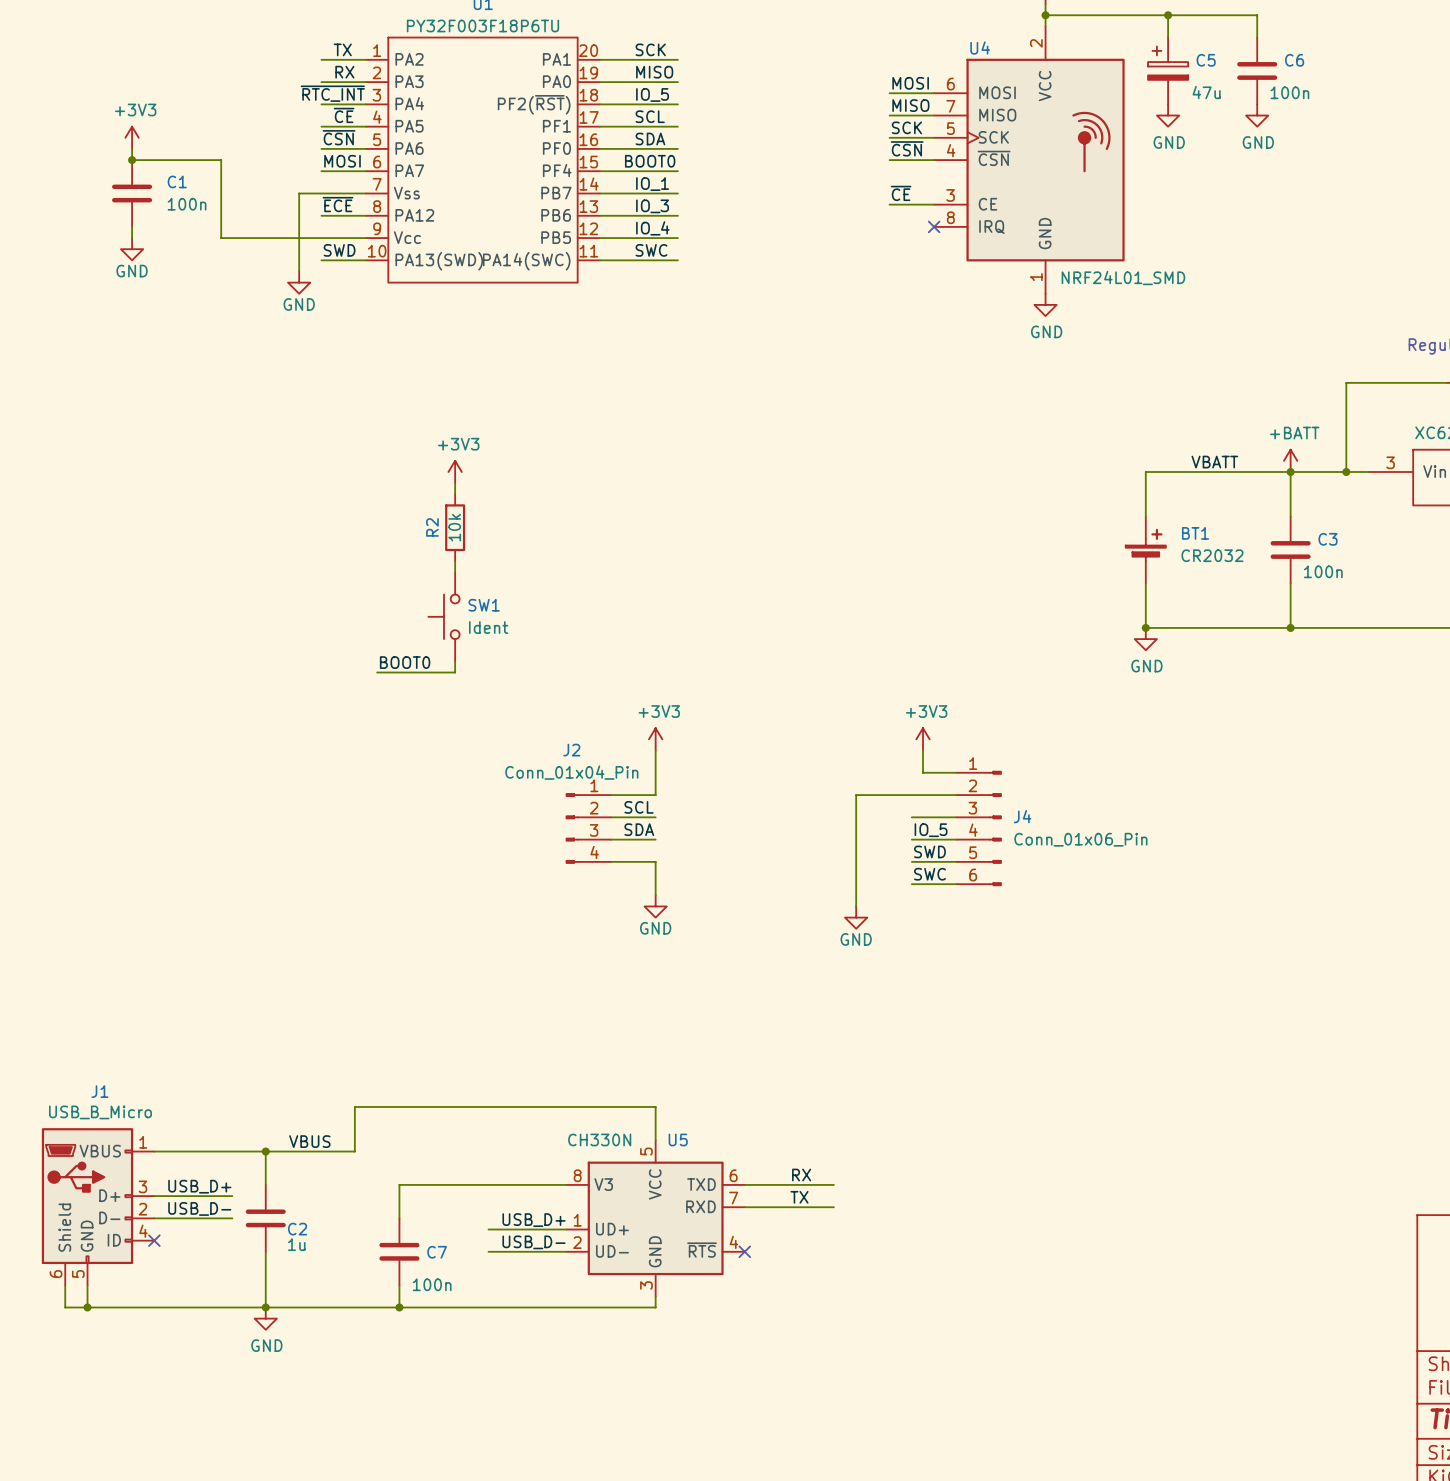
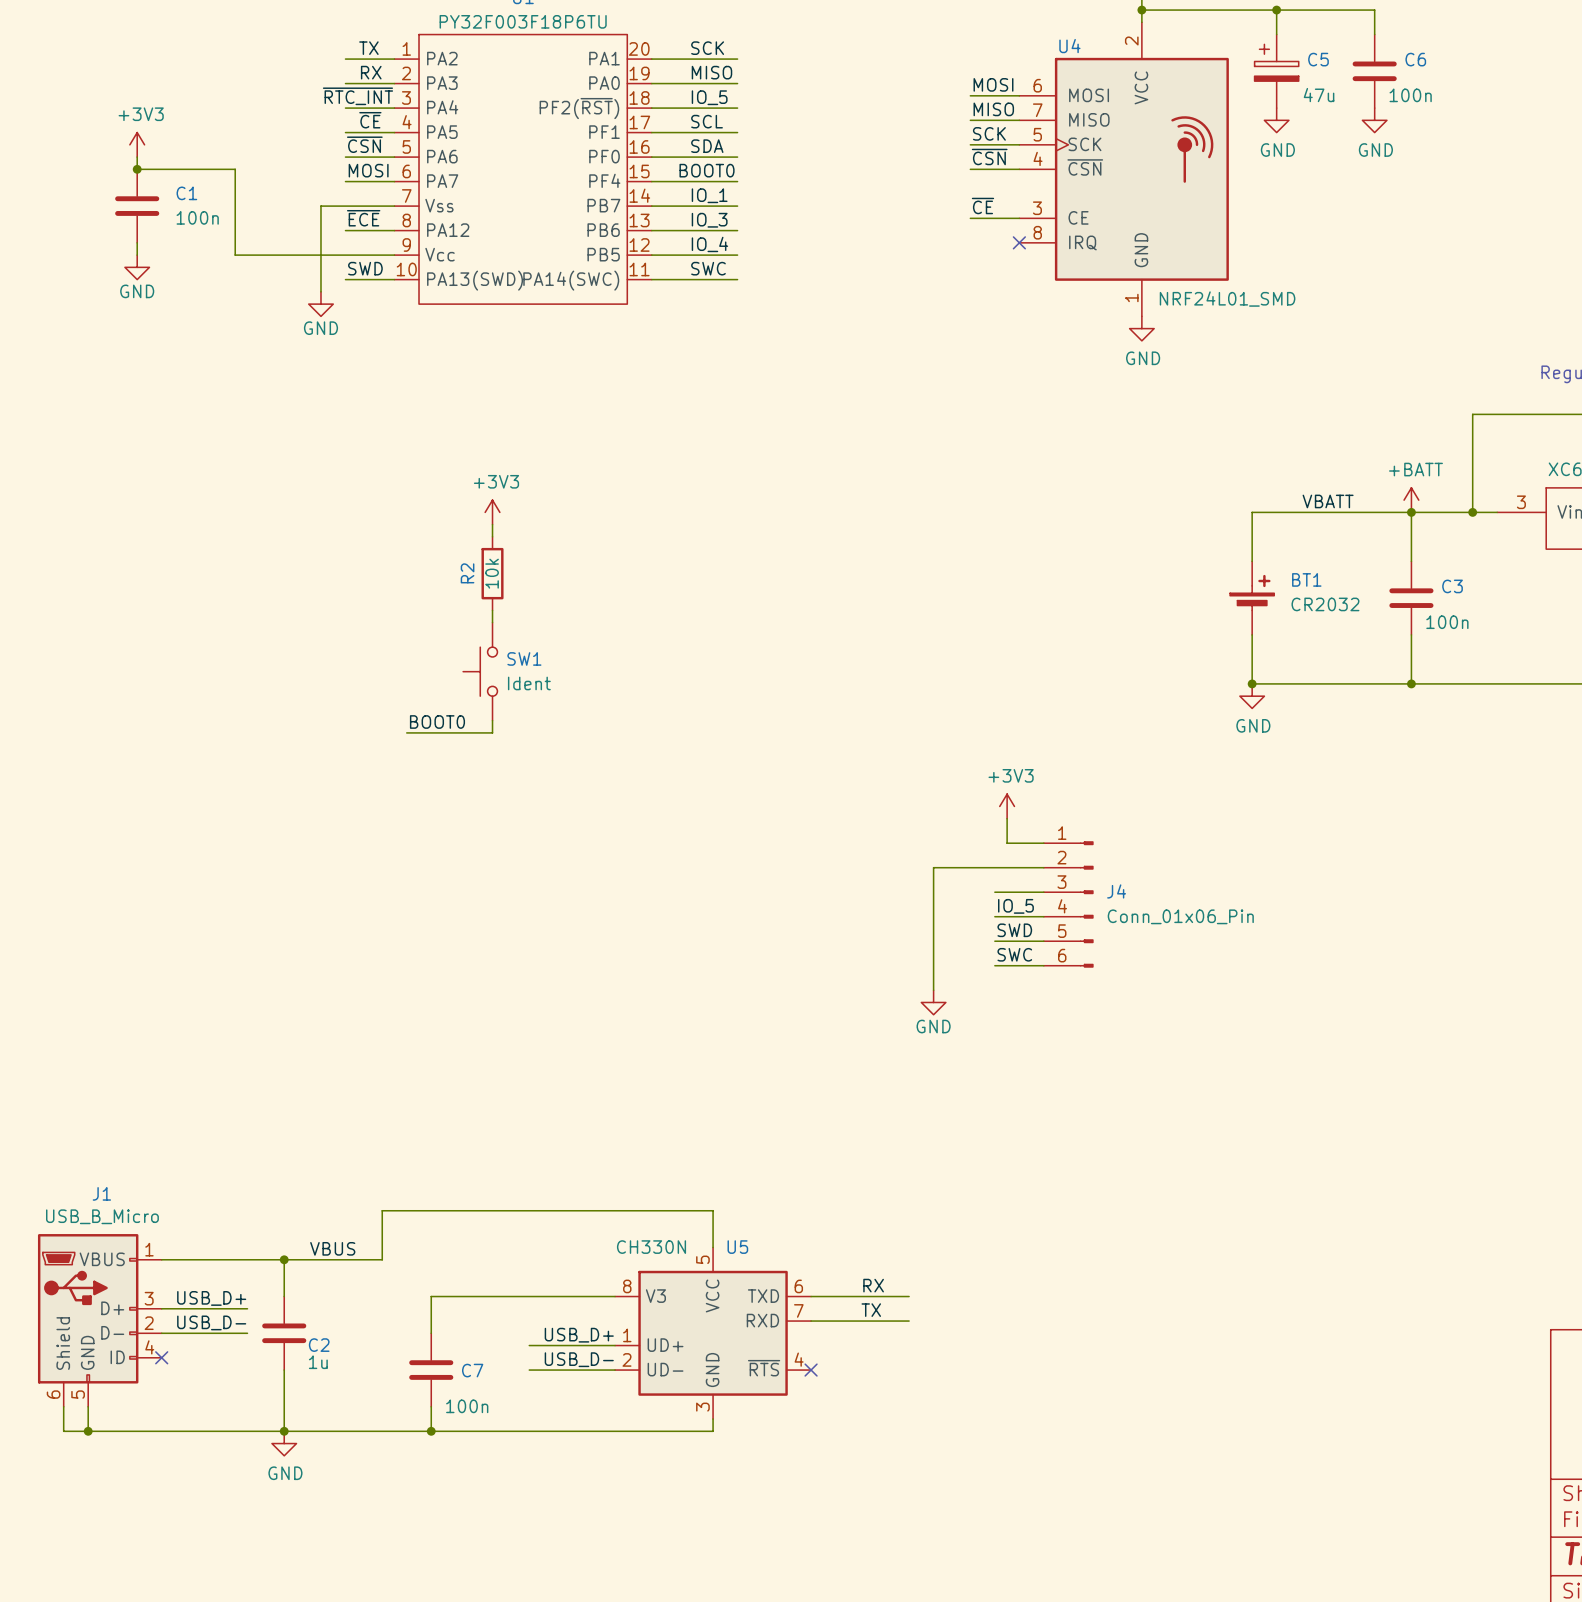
power symbol: +3V3 (655, 739) -> none
wire: (655, 750) (655, 795) (611, 795) -> none
label: SCL (639, 807) -> none
wire: (611, 817) (655, 817) -> none
J2: Conn_01x04_Pin (588, 828) -> none
label: SDA (639, 829) -> none
wire: (611, 839) (655, 839) -> none
wire: (611, 861) (655, 861) (655, 895) -> none
power symbol: GND (655, 906) -> none

